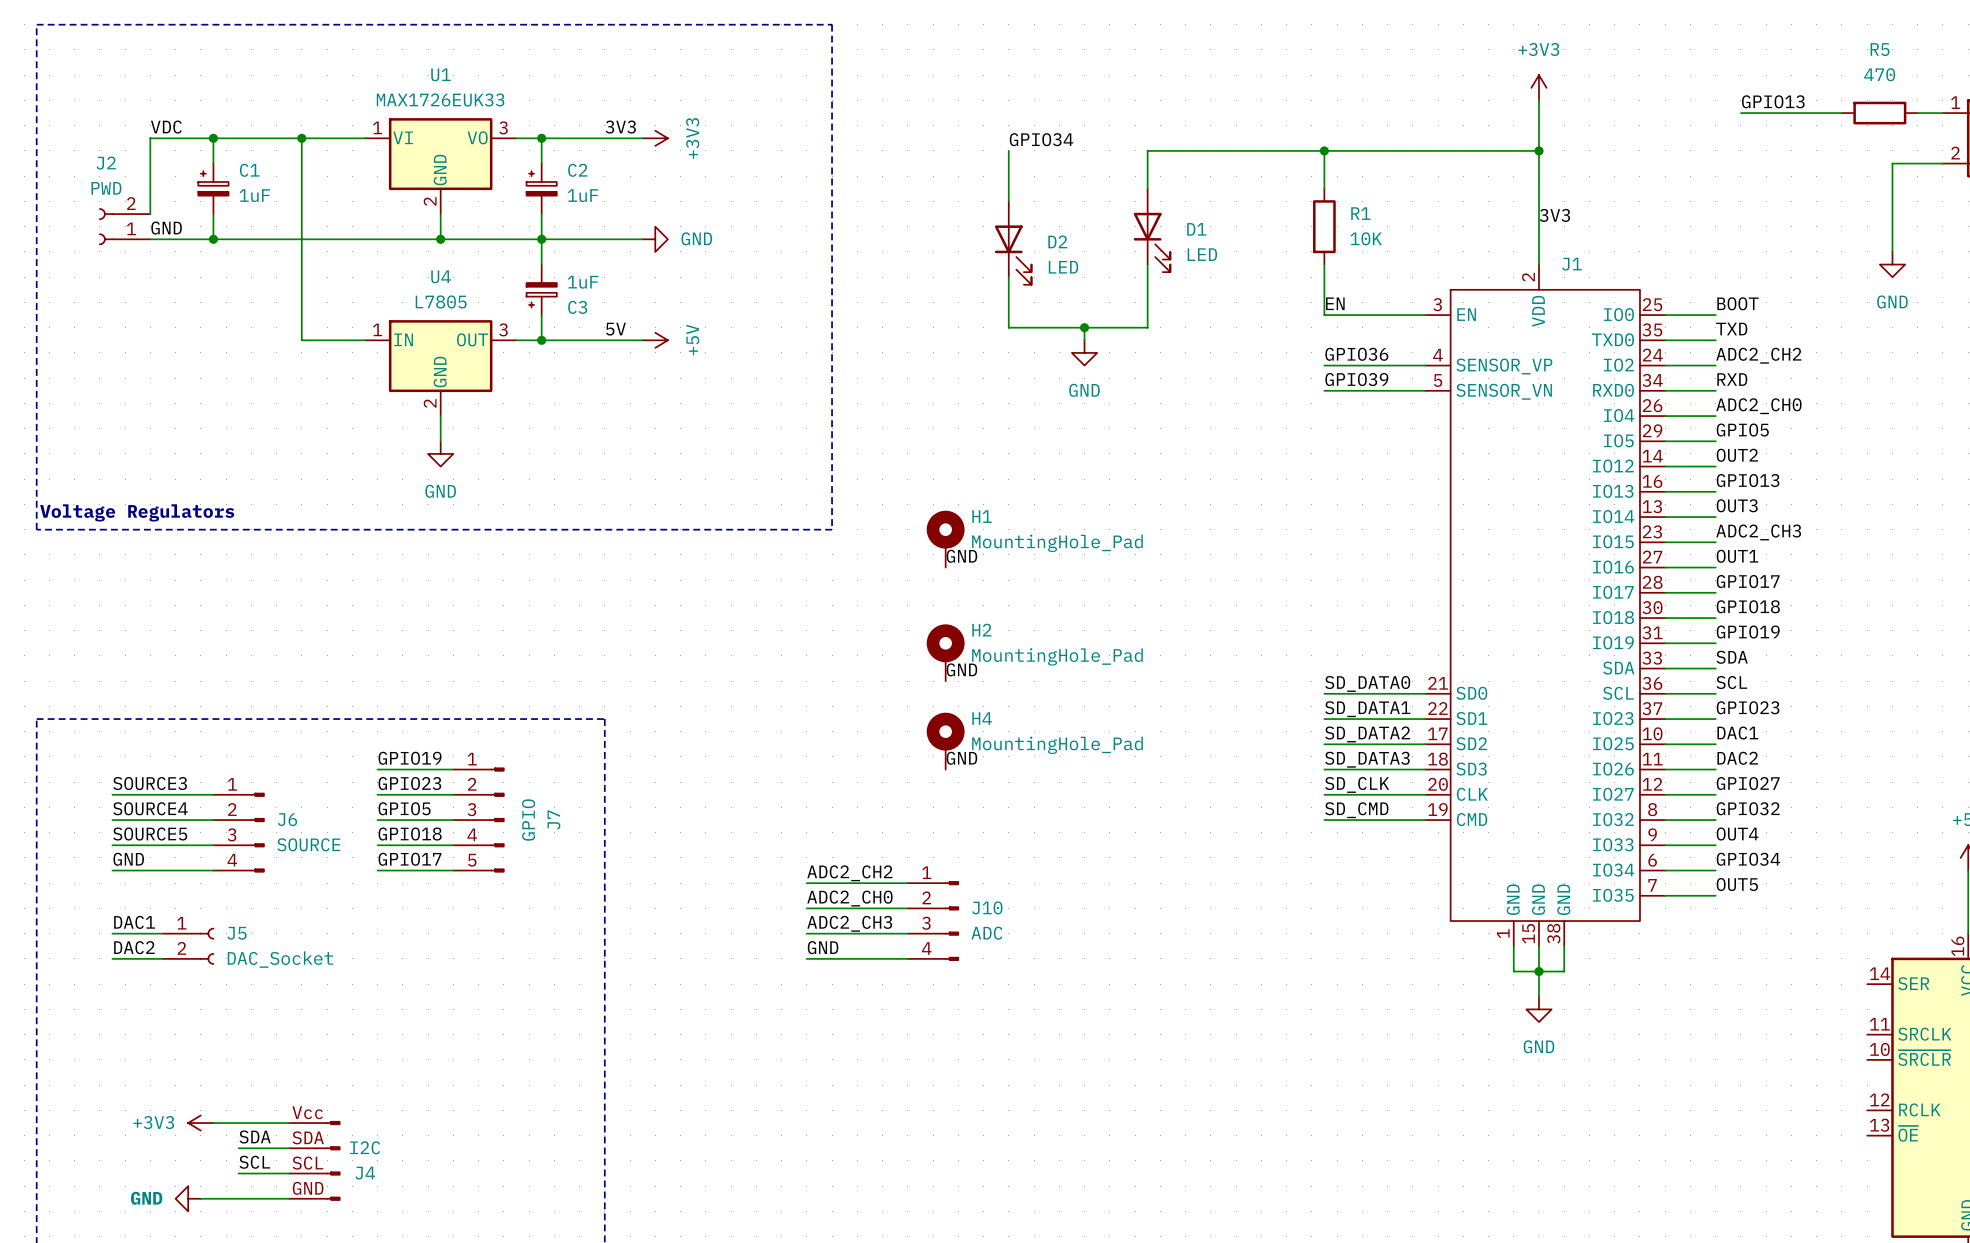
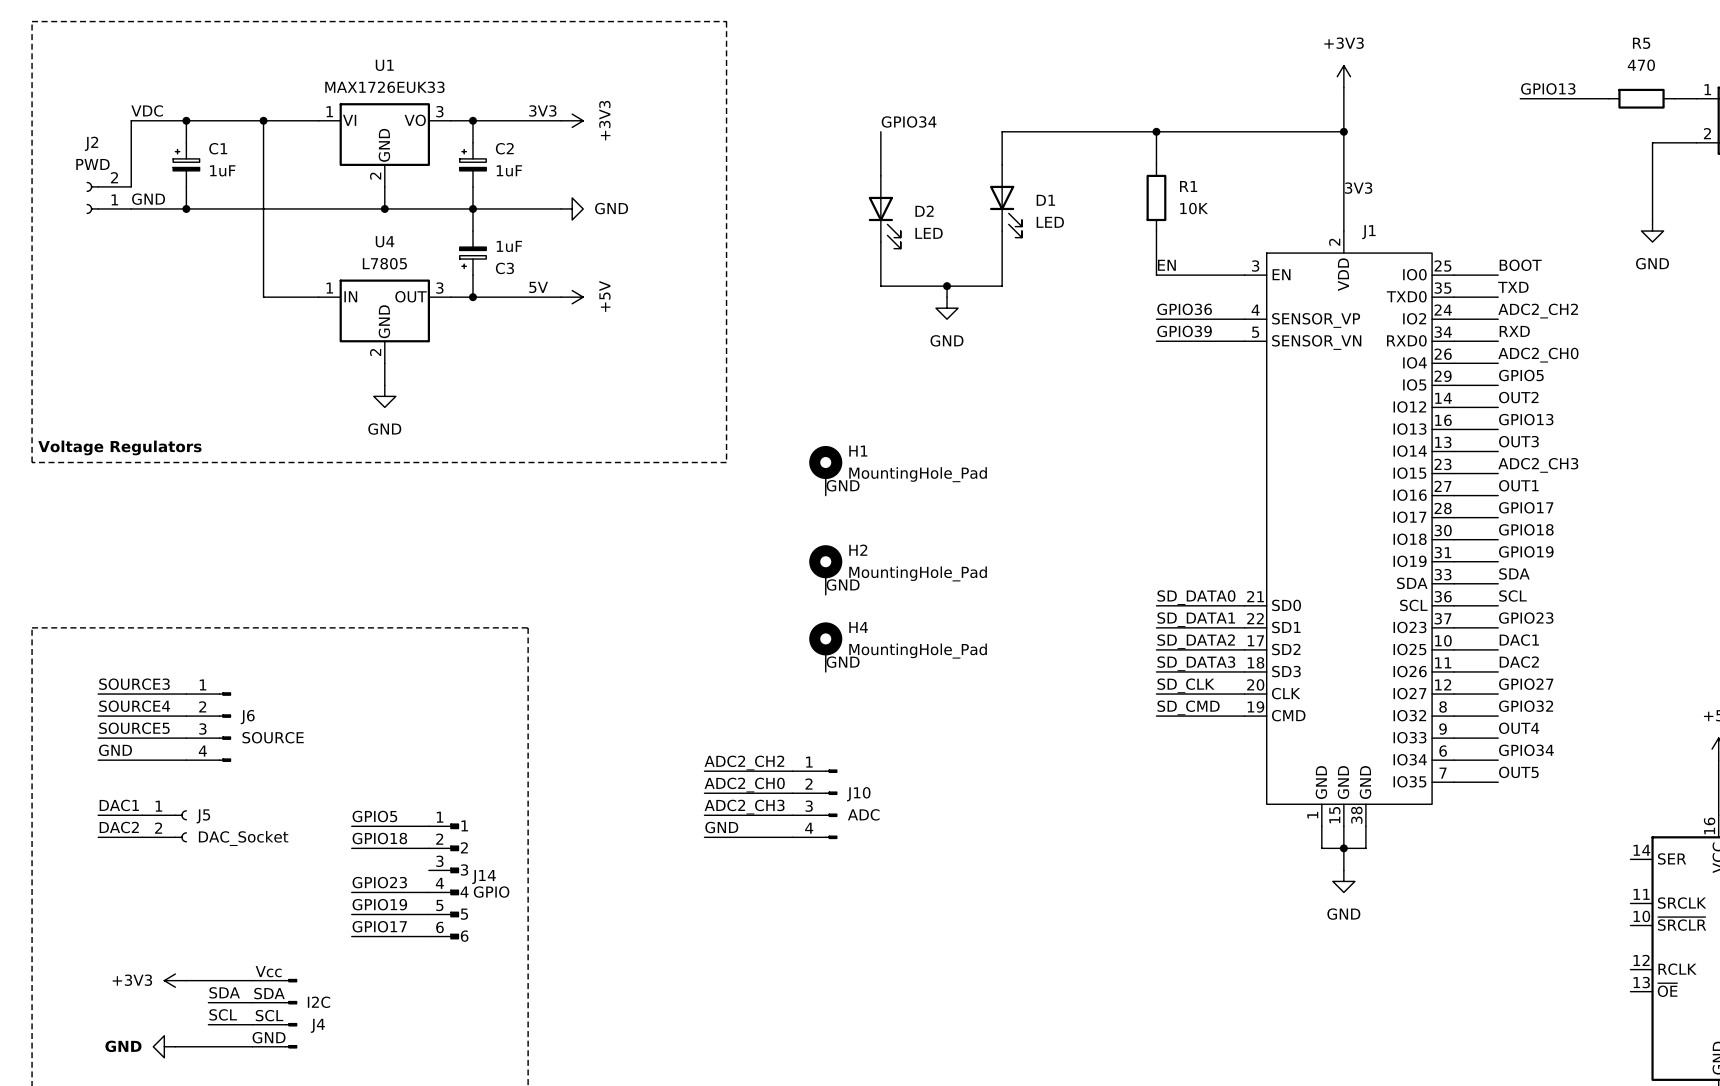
label: GPIO19 (410, 758) -> none
wire: (377, 769) (453, 769) -> none
label position: GPIO23 (409, 783) -> GPIO23 (379, 882)
wire: (377, 794) (453, 794) -> none
label position: GPIO5 (404, 808) -> GPIO5 (374, 816)
wire: (377, 820) (453, 820) -> none
J7: GPIO (478, 820) -> none
label position: GPIO18 (410, 834) -> GPIO18 (379, 838)
wire: (377, 845) (453, 845) -> none
label position: GPIO17 (409, 859) -> GPIO17 (379, 926)
wire: (377, 870) (453, 870) -> none
wire: none -> (351, 826) (428, 826)
wire: none -> (351, 848) (428, 848)
J14: none -> GPIO (444, 881)
wire: none -> (351, 892) (428, 892)
label: none -> GPIO19 (379, 904)
wire: none -> (351, 914) (428, 914)
wire: none -> (351, 936) (428, 936)

